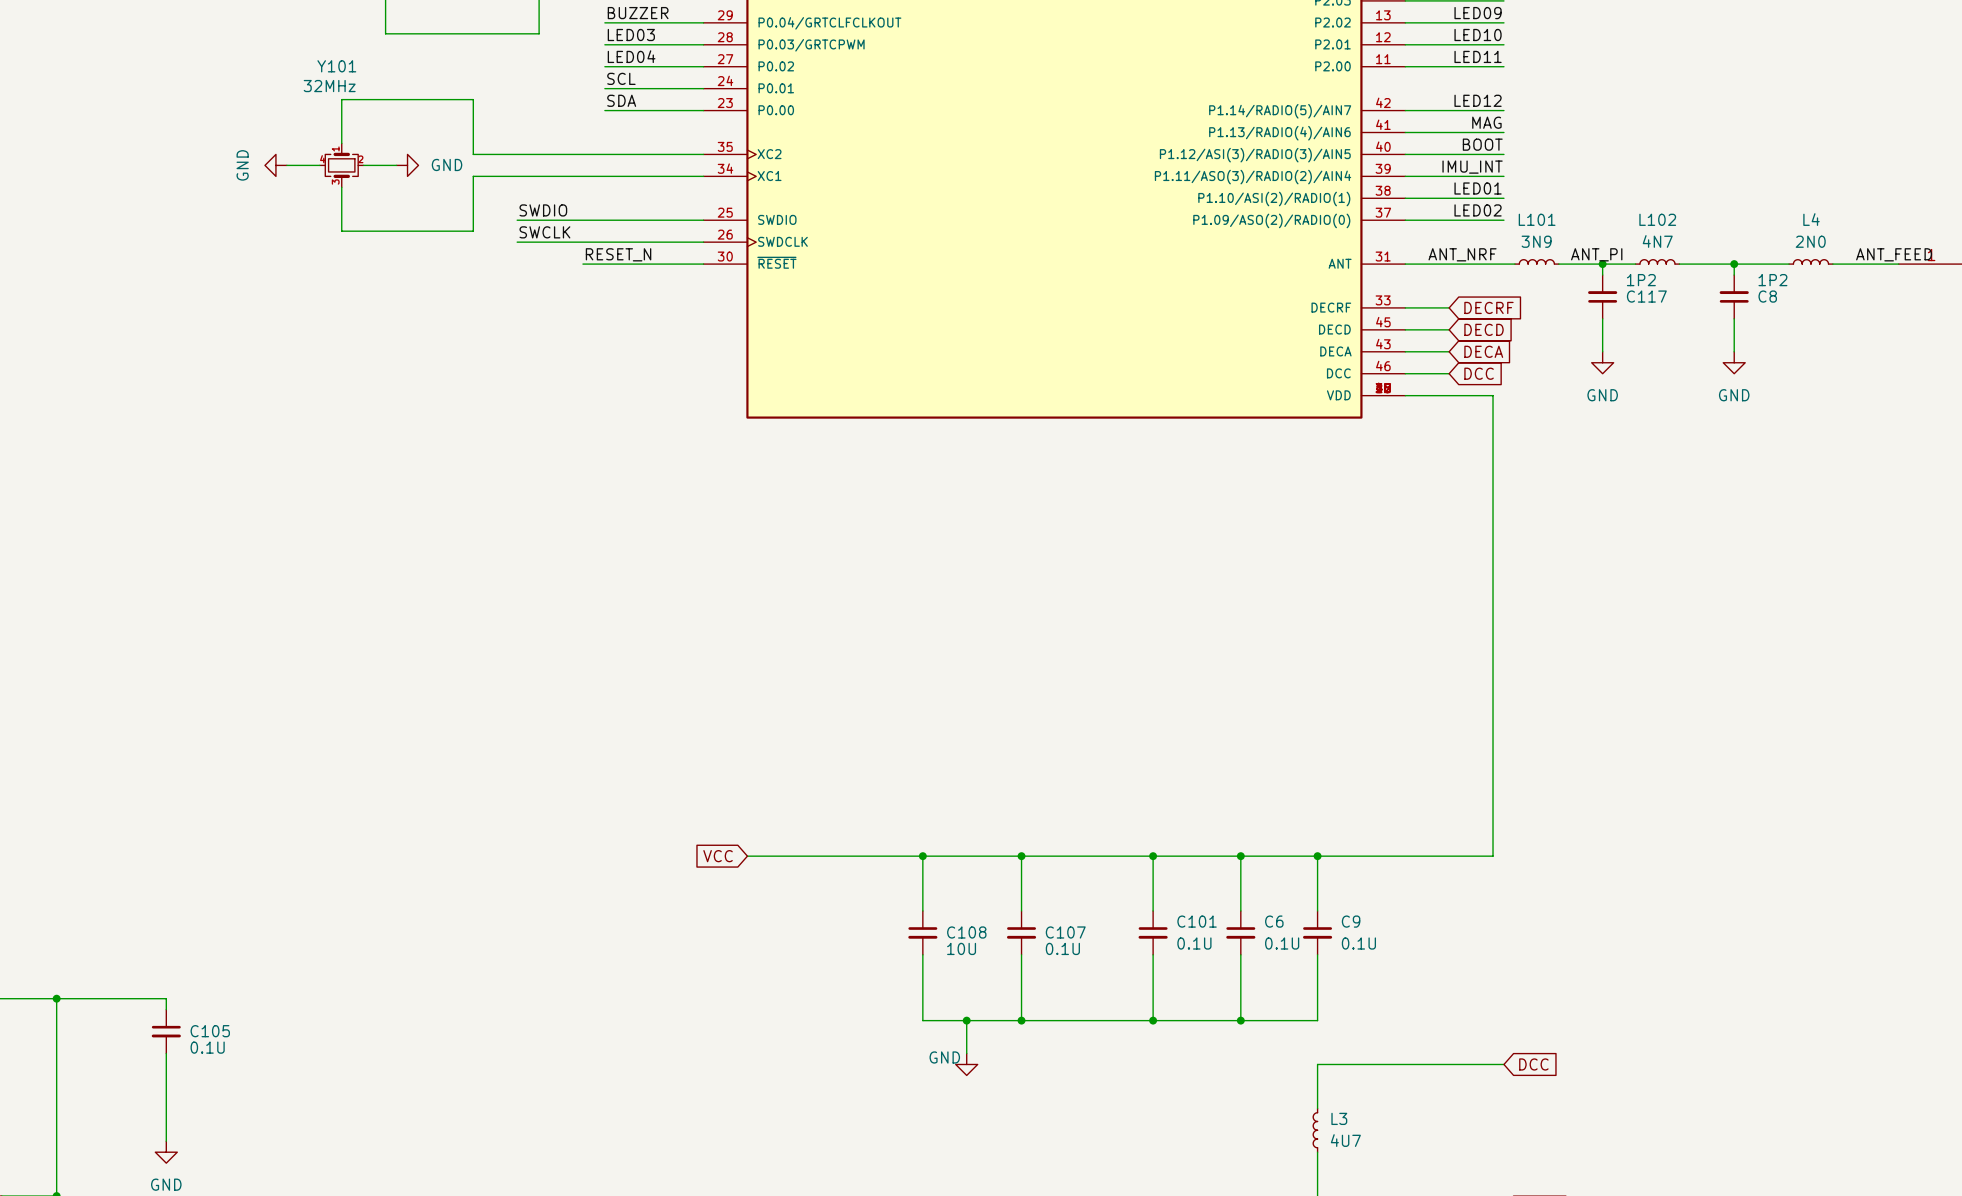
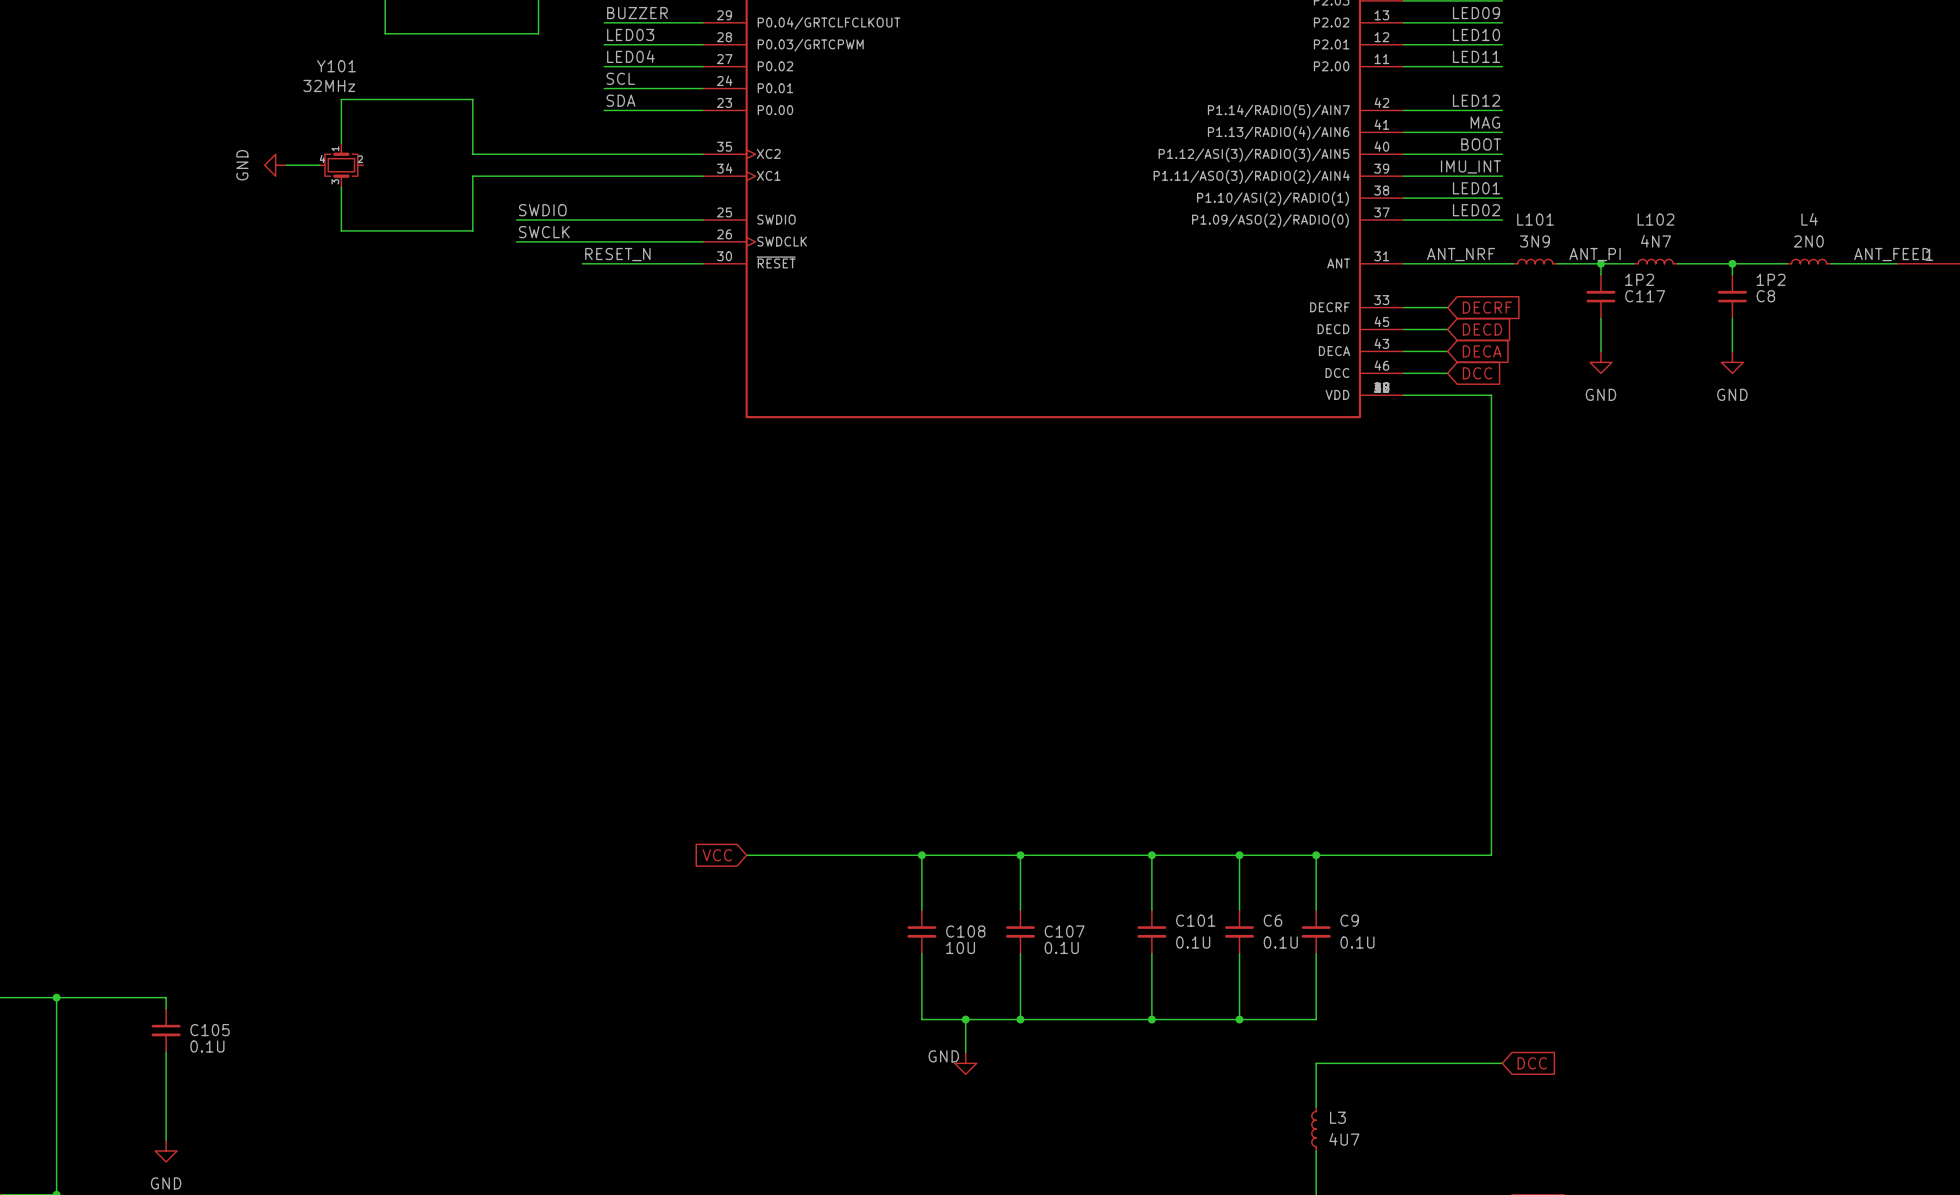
wire: (363, 165) (396, 165) -> none
power symbol: GND (407, 165) -> none

